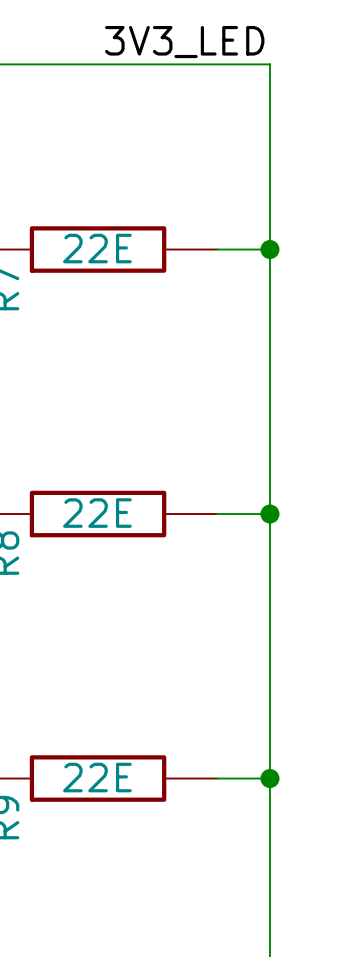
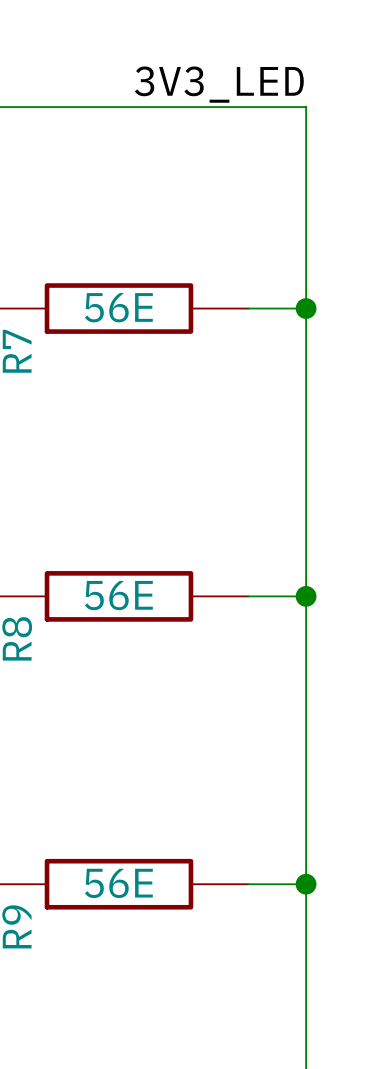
R7 value: 22E (97, 248) -> 56E (118, 307)
R8 value: 22E (97, 513) -> 56E (118, 595)
R9 value: 22E (97, 777) -> 56E (118, 883)

